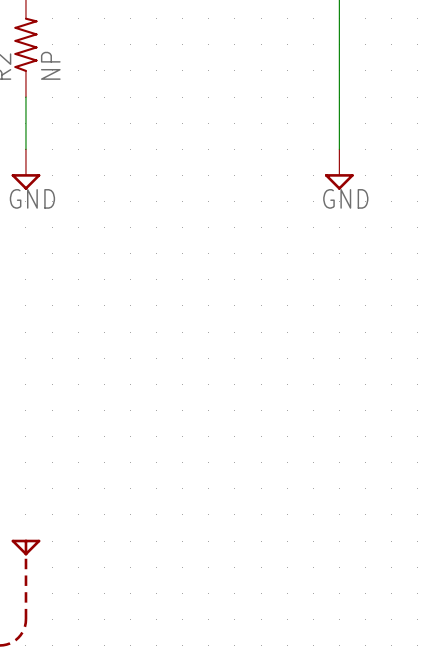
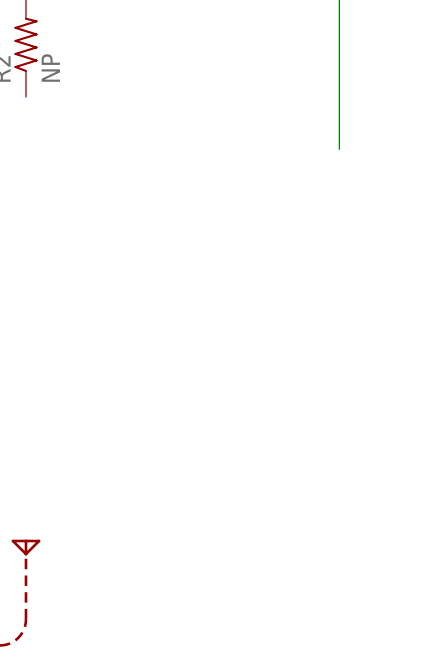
wire: (25, 97) (25, 149) -> none
power symbol: GND (25, 169) -> none
power symbol: GND (339, 169) -> none

